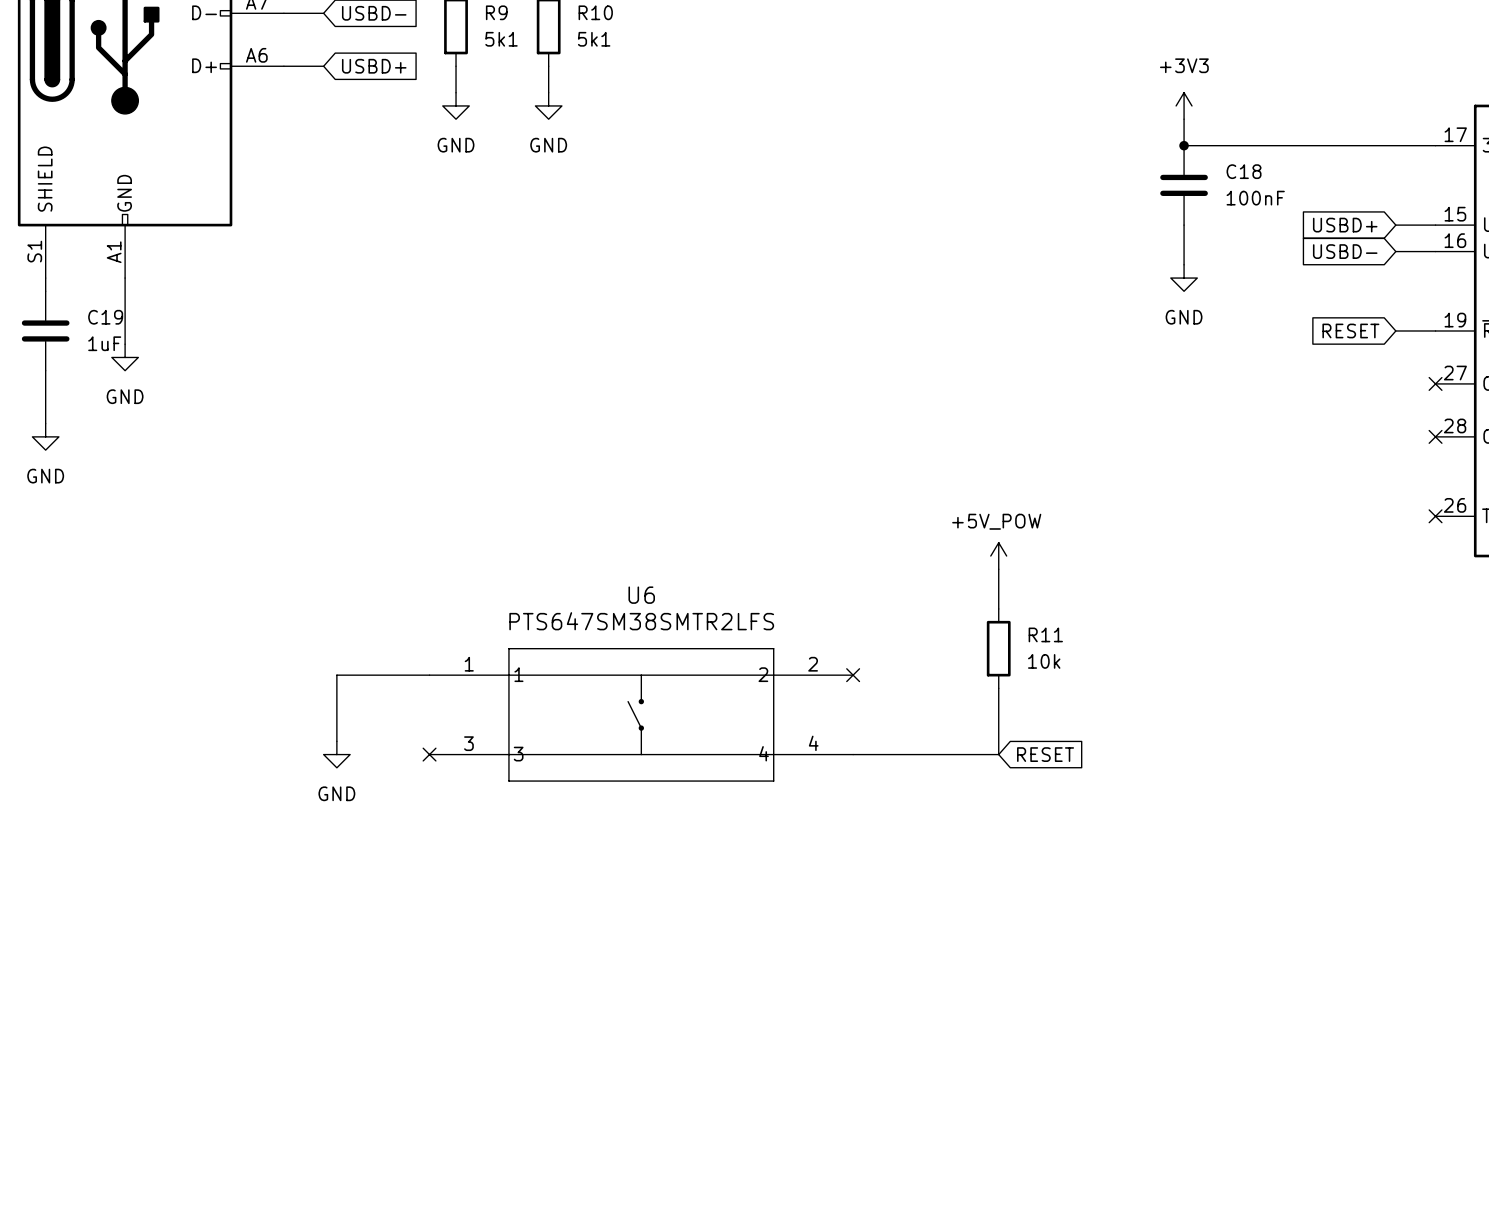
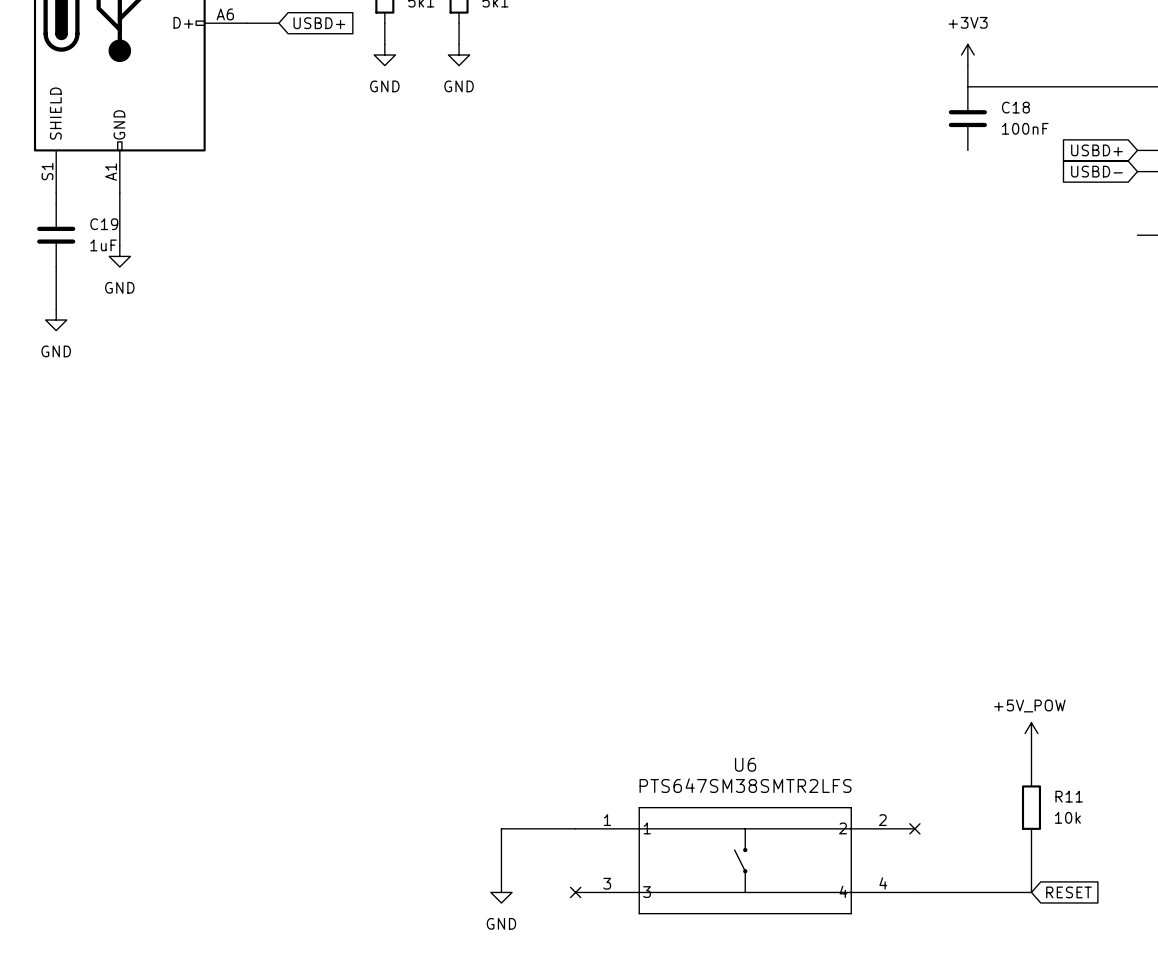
junction: (1184, 145) -> none
wire: (1184, 225) (1184, 264) -> none
power symbol: GND (1184, 278) -> none
global label: RESET (1350, 330) -> none
power symbol: +5V_POW (998, 556) -> none
wire: (998, 569) (998, 608) -> none
R11 position: (998, 648) -> (1031, 807)
wire: (429, 675) (336, 675) (336, 741) -> none
no-connect mark: (853, 675) -> none
wire: (998, 688) (998, 754) (853, 754) -> none
U6 position: (641, 714) -> (745, 860)
power symbol: GND (336, 754) -> none
no-connect mark: (429, 754) -> none
global label: RESET (1045, 754) -> none
power symbol: none -> +5V_POW (1031, 733)
wire: none -> (1031, 744) (1031, 775)
wire: none -> (575, 828) (501, 828) (501, 881)
no-connect mark: none -> (914, 828)
wire: none -> (1031, 839) (1031, 892) (914, 892)
power symbol: none -> GND (501, 892)
no-connect mark: none -> (575, 892)
global label: none -> RESET (1068, 892)

